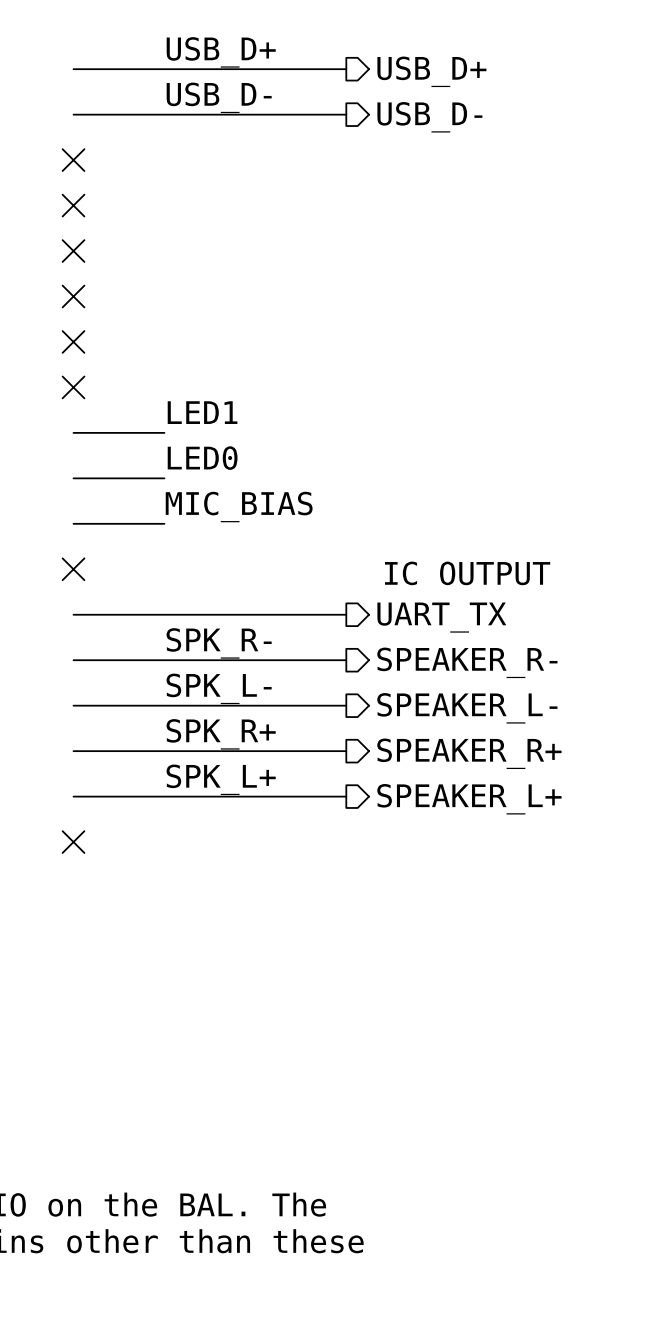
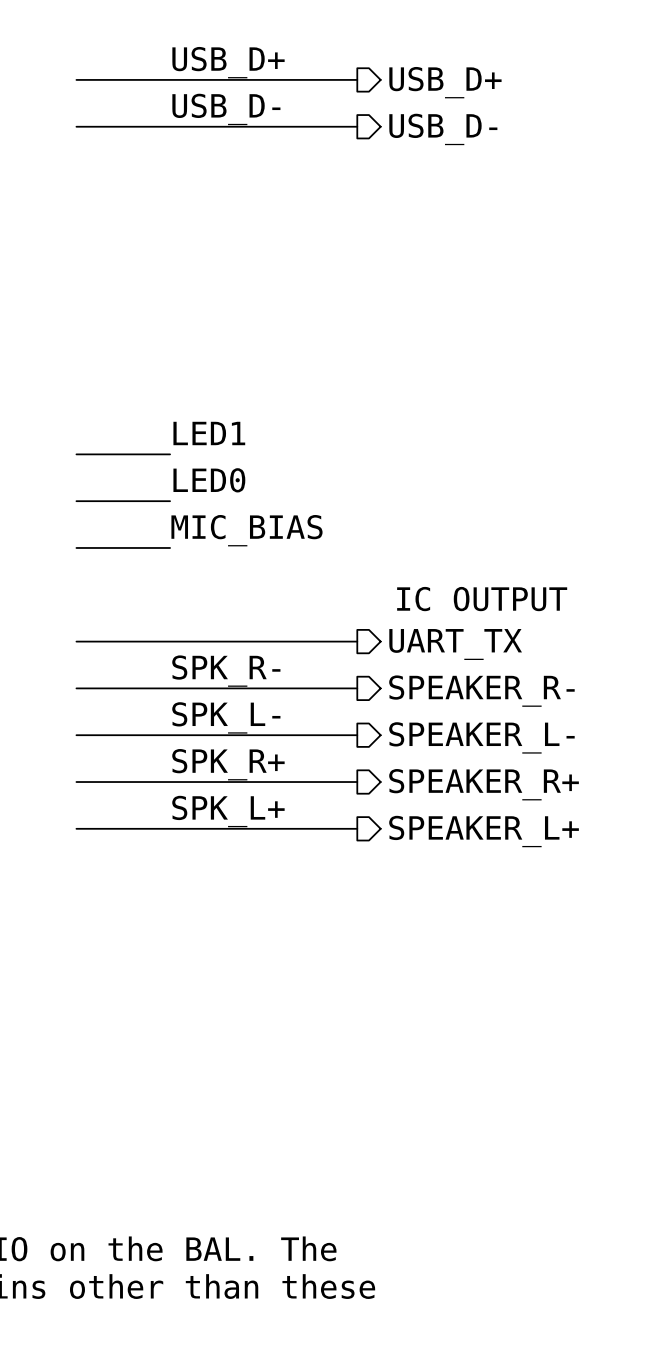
no-connect mark: (73, 160) -> none
no-connect mark: (73, 205) -> none
no-connect mark: (73, 251) -> none
no-connect mark: (73, 296) -> none
no-connect mark: (73, 341) -> none
no-connect mark: (73, 387) -> none
no-connect mark: (73, 569) -> none
no-connect mark: (73, 842) -> none

